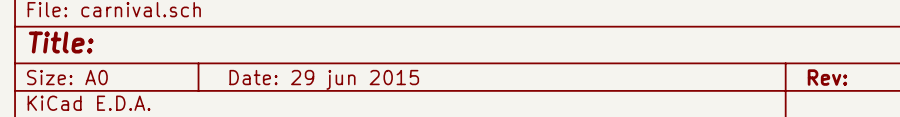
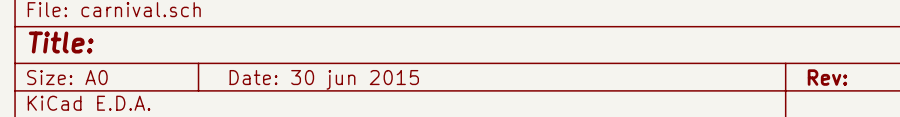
title block: Date: 29 jun 2015 (324, 79) -> Date: 30 jun 2015 (324, 79)

